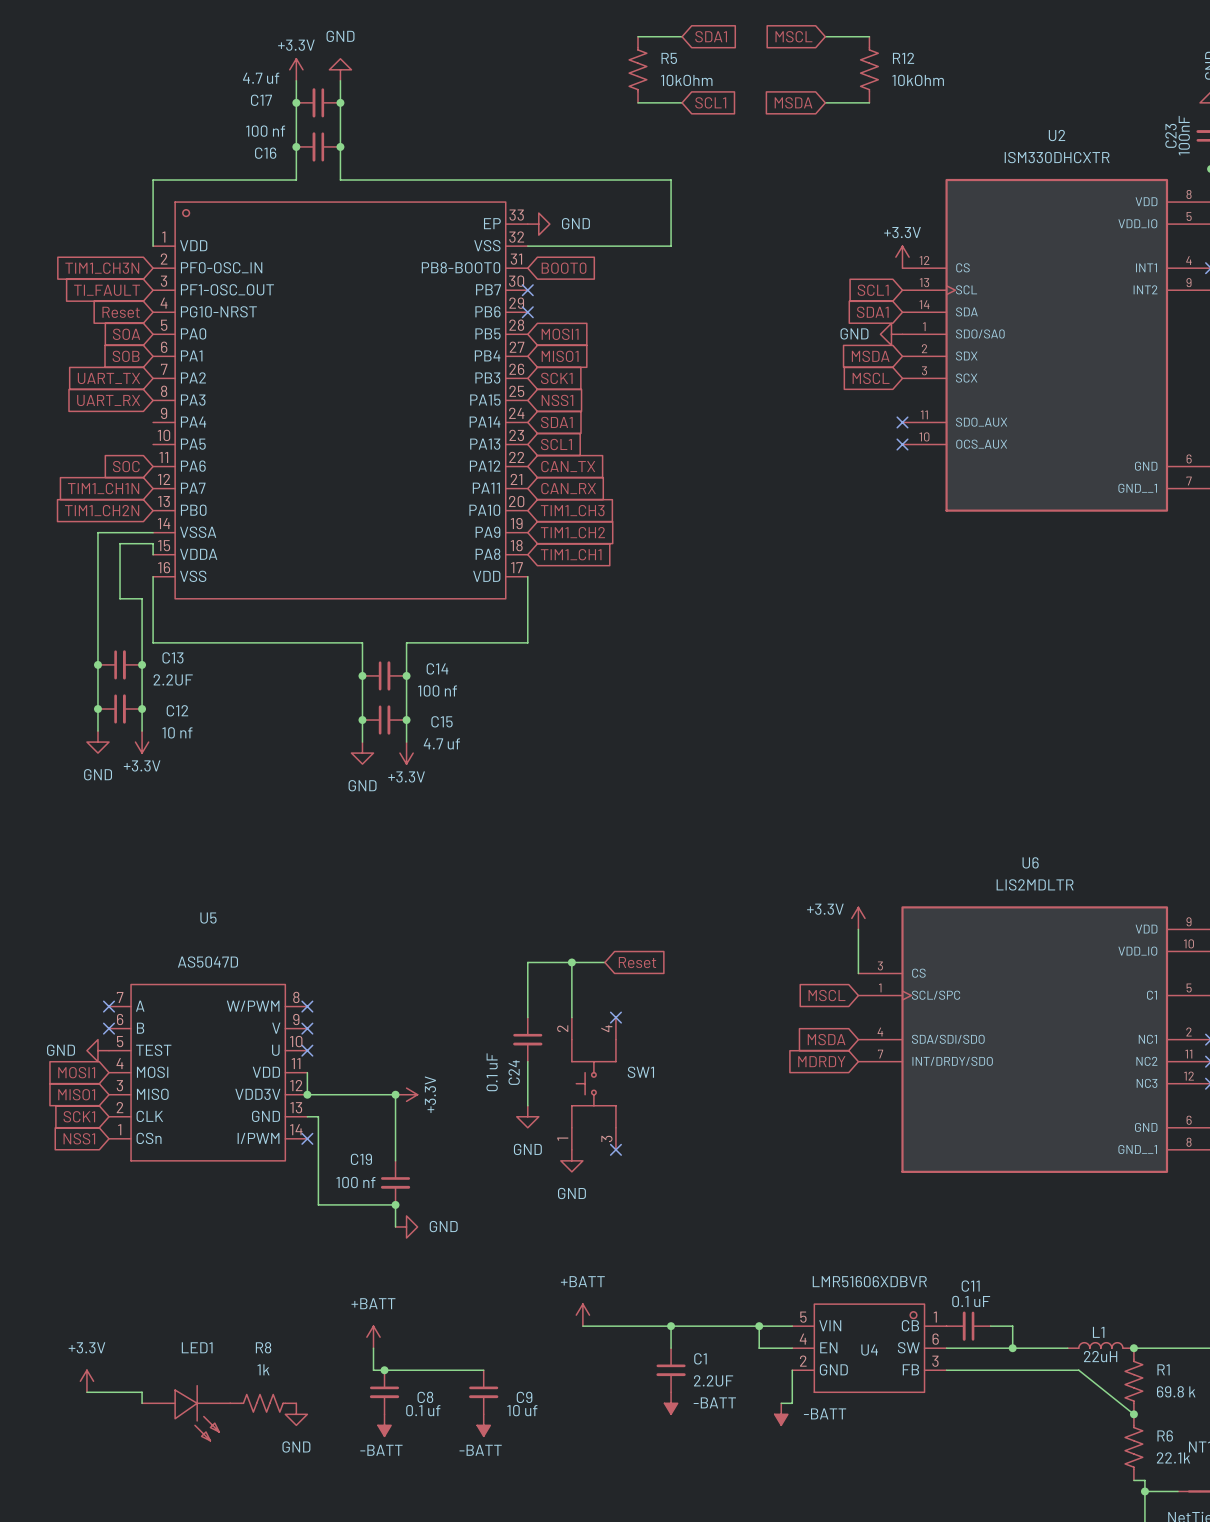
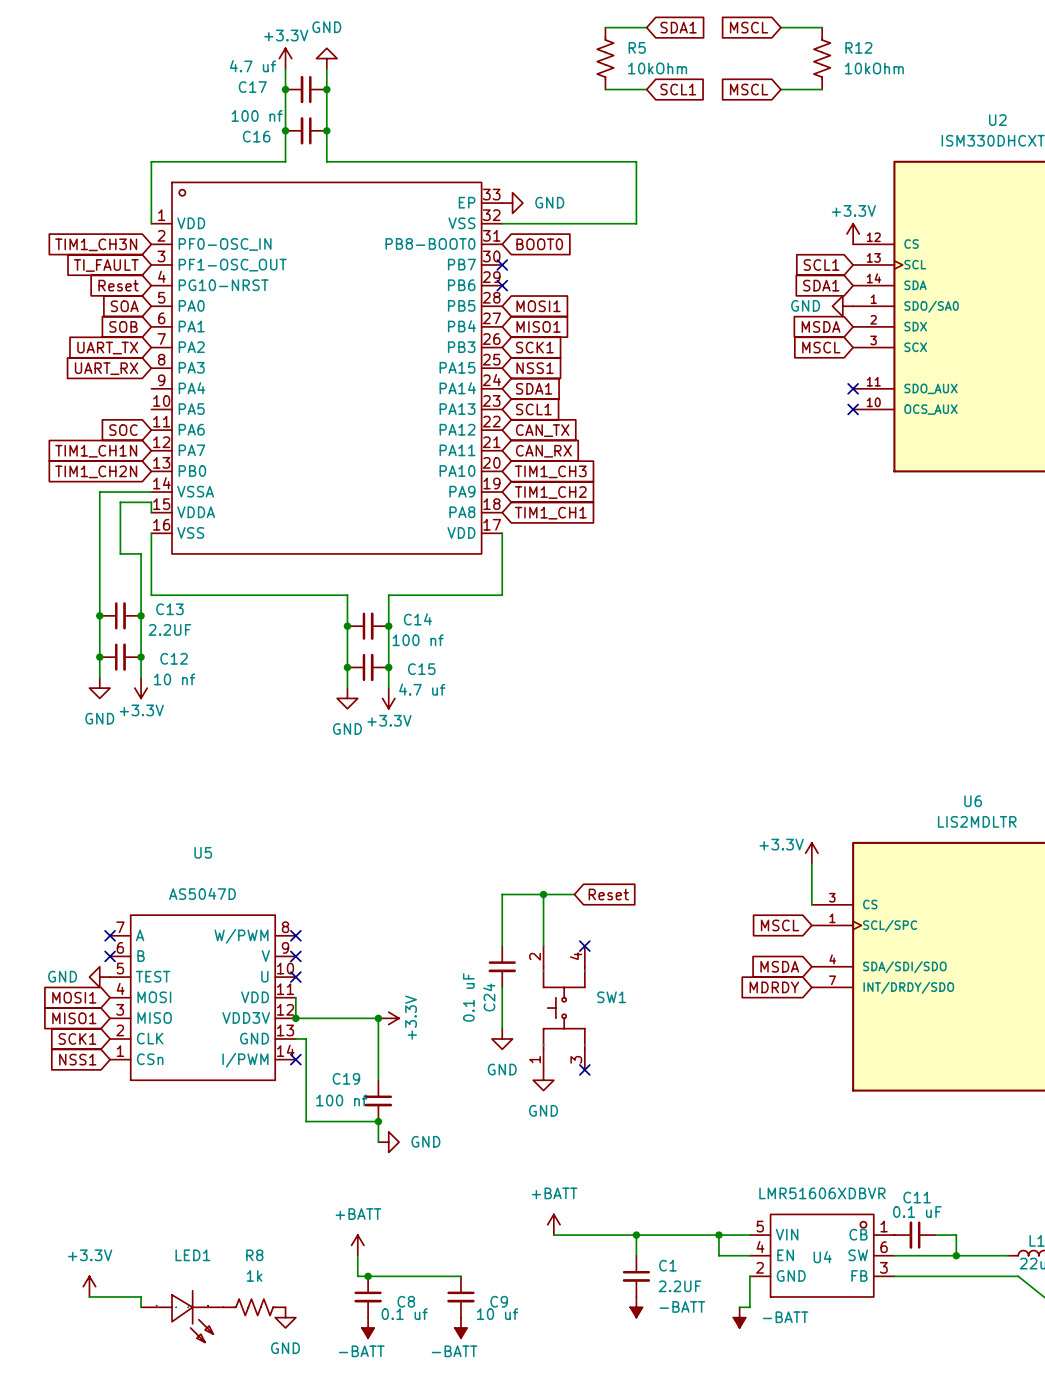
global label: MSDA (793, 102) -> MSCL (749, 89)

